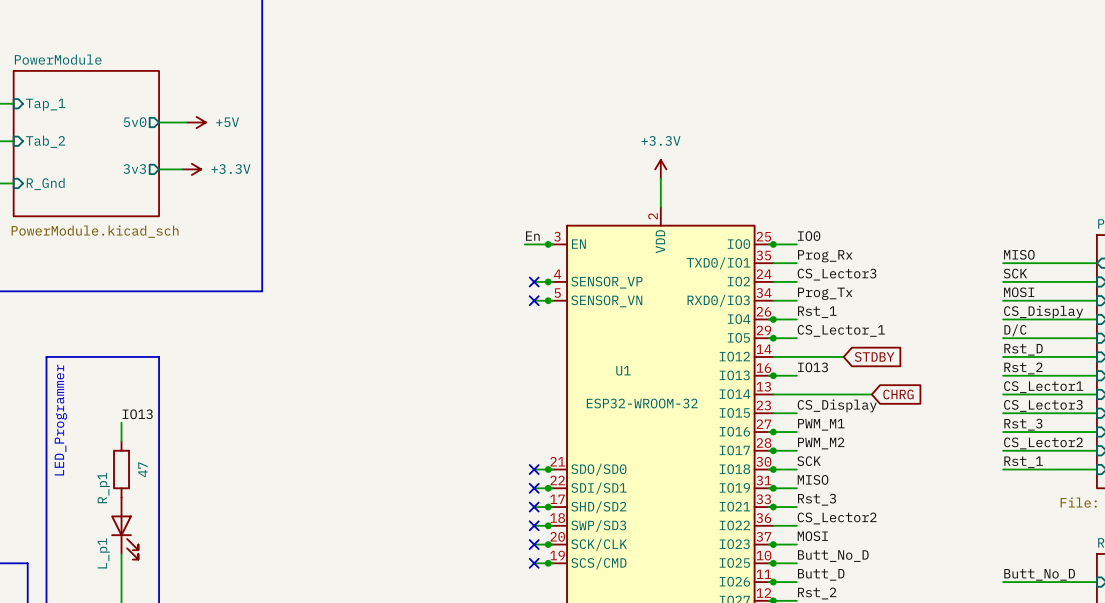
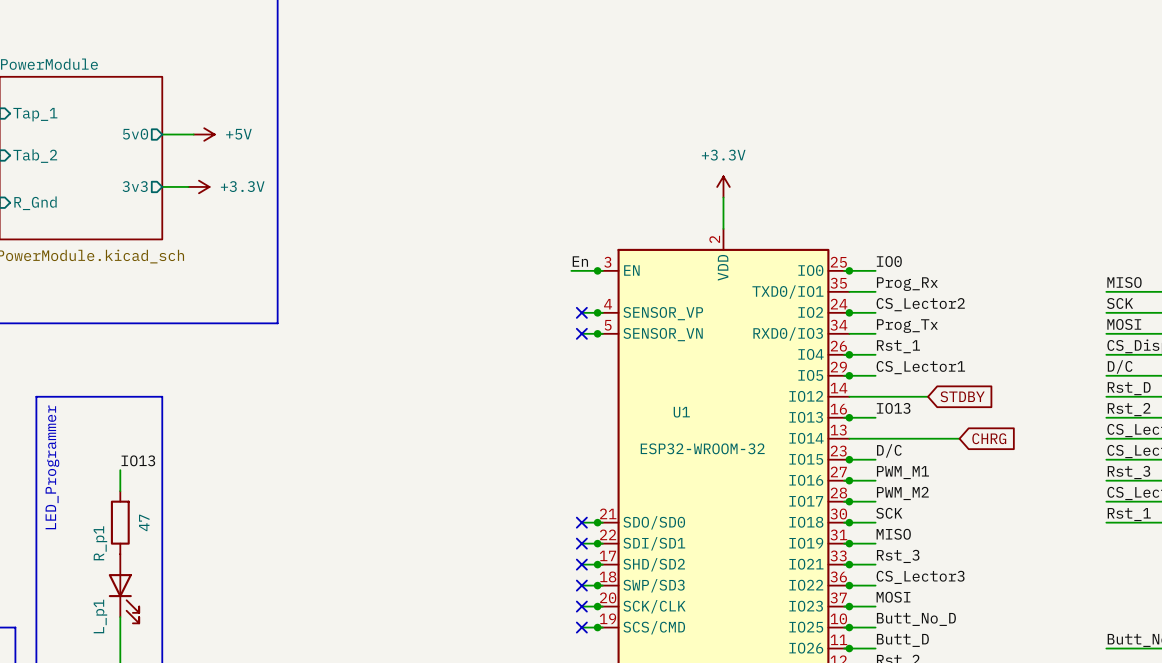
label: CS_Lector3 (837, 274) -> CS_Lector2 (920, 304)
junction: none -> (849, 312)
label: CS_Lector_1 (841, 330) -> CS_Lector1 (920, 367)
label: CS_Display (837, 405) -> D/C (889, 450)
junction: none -> (849, 459)
label: CS_Lector2 (837, 518) -> CS_Lector3 (920, 577)
junction: none -> (849, 585)

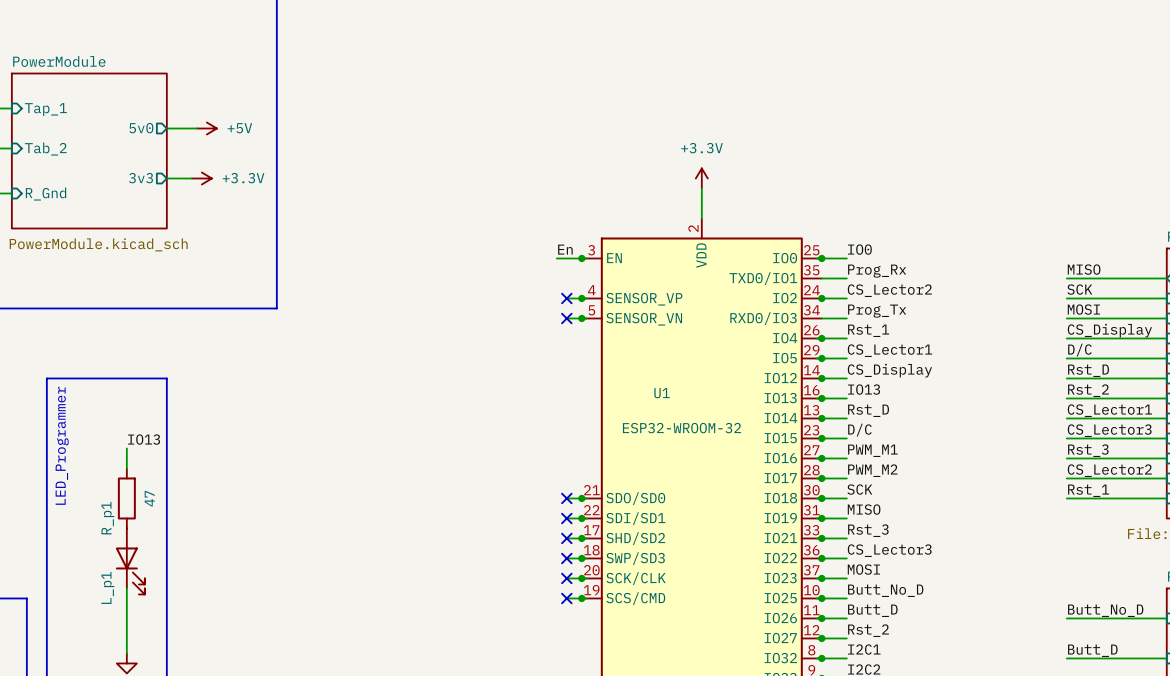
label: none -> CS_Display (889, 370)
junction: none -> (821, 378)
wire: (875, 396) (928, 396) -> none
global label: STDBY (962, 396) -> none
label: none -> Rst_D (868, 410)
junction: none -> (821, 418)
wire: (875, 438) (959, 438) -> none
global label: CHRG (989, 438) -> none

